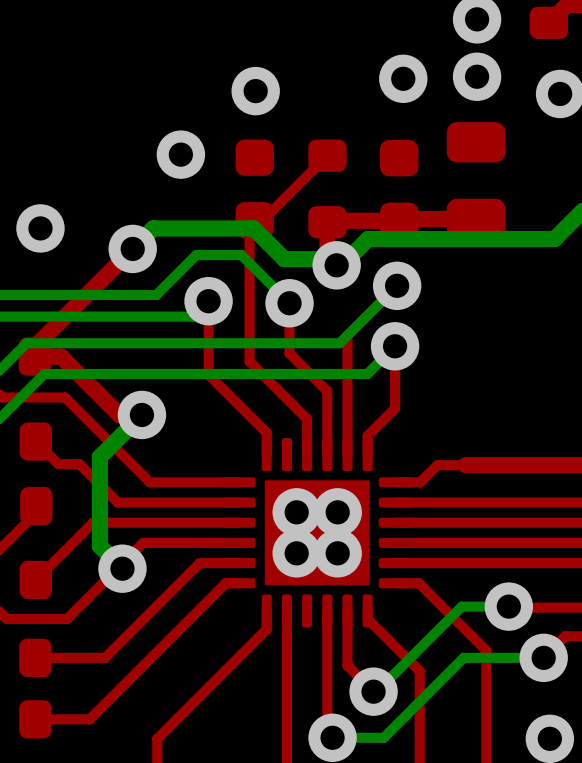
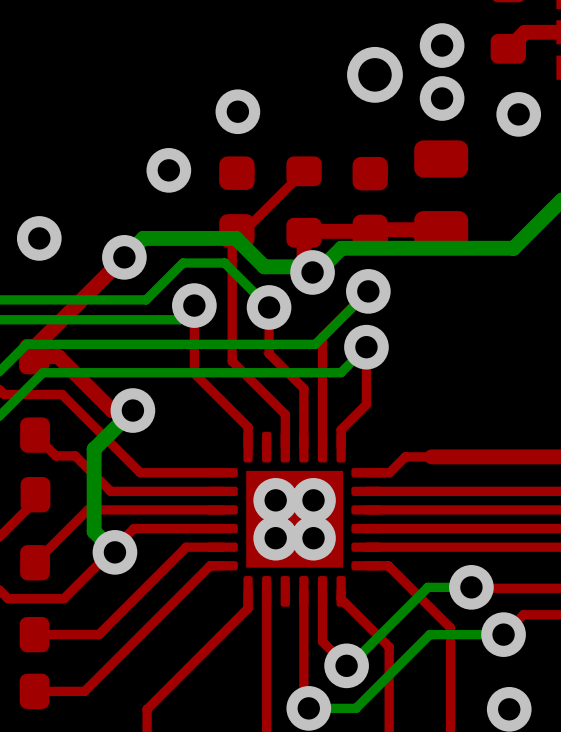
via position: (403, 78) -> (374, 74)

